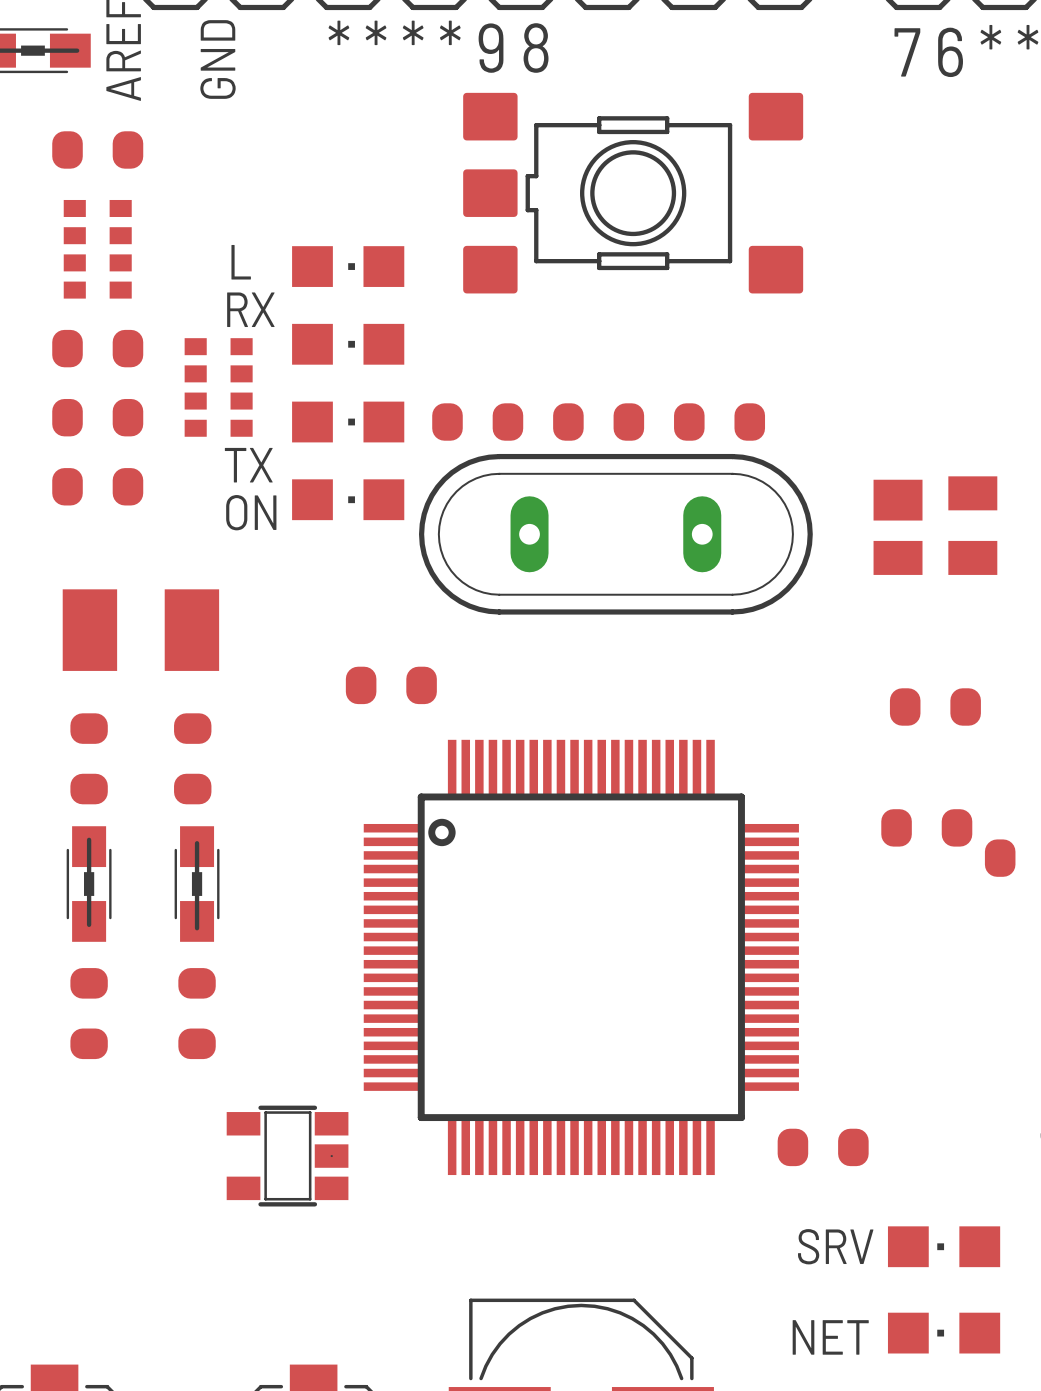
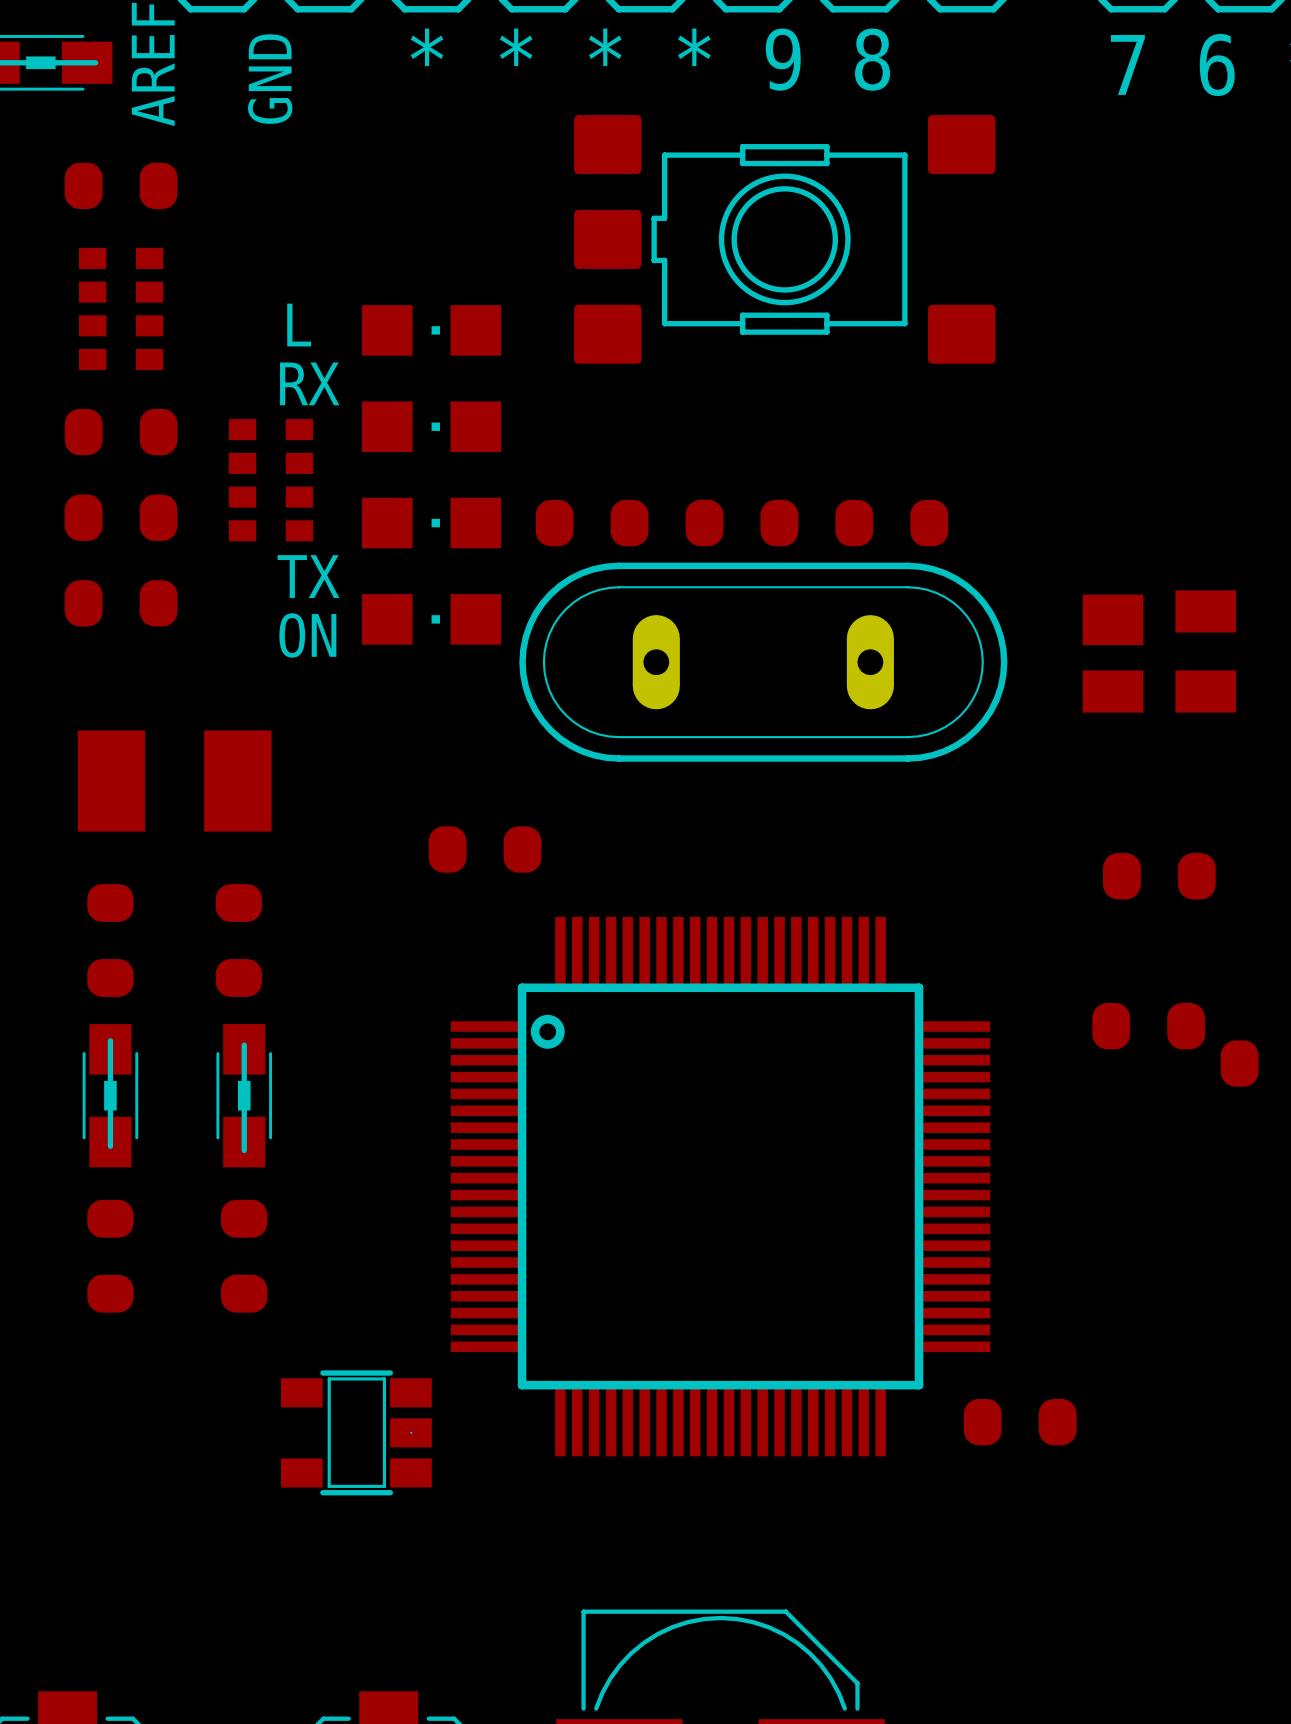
SRV: (944, 1246) -> none
NET: (944, 1333) -> none

